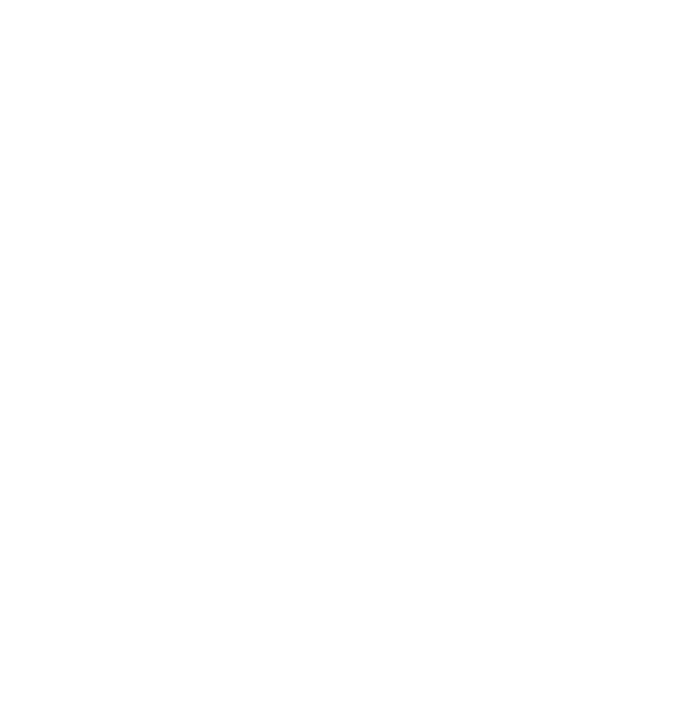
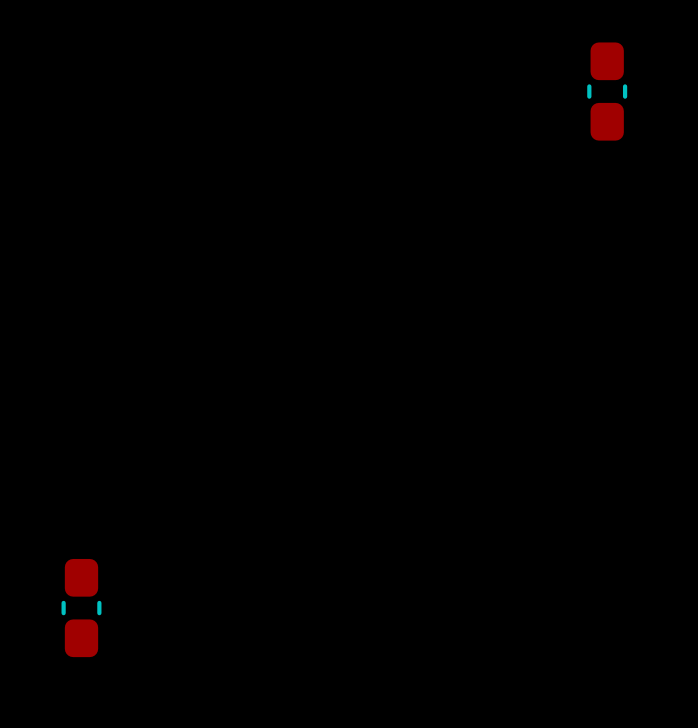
part: none -> (607, 91)
part: none -> (81, 608)

